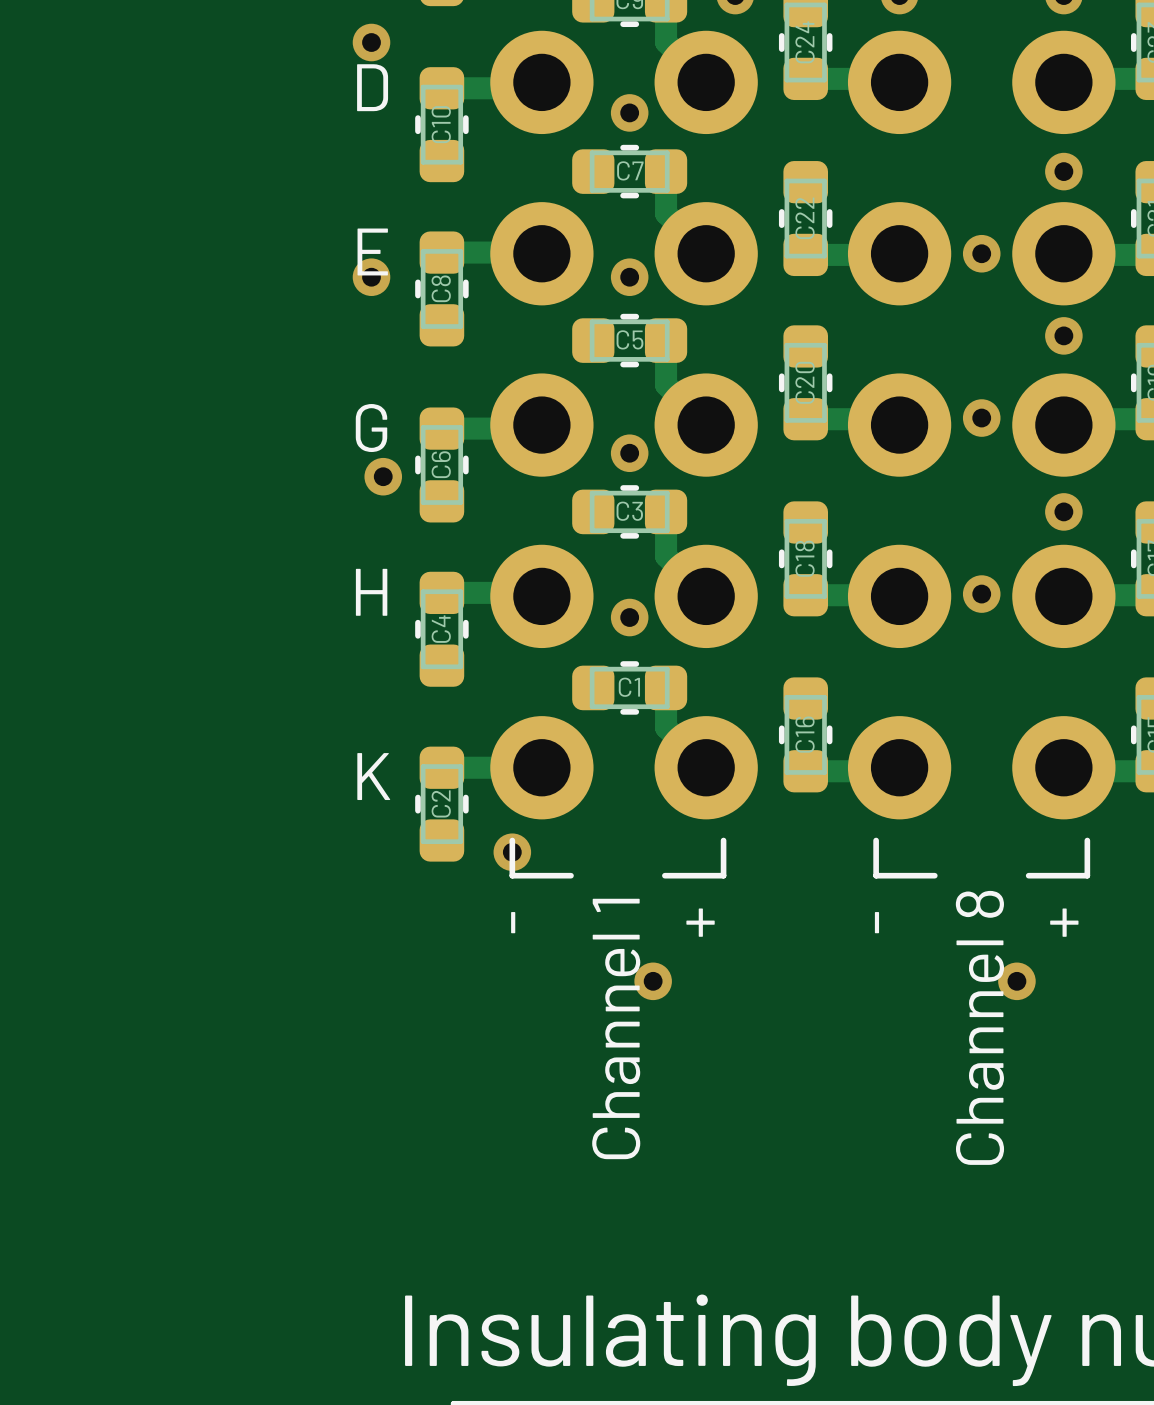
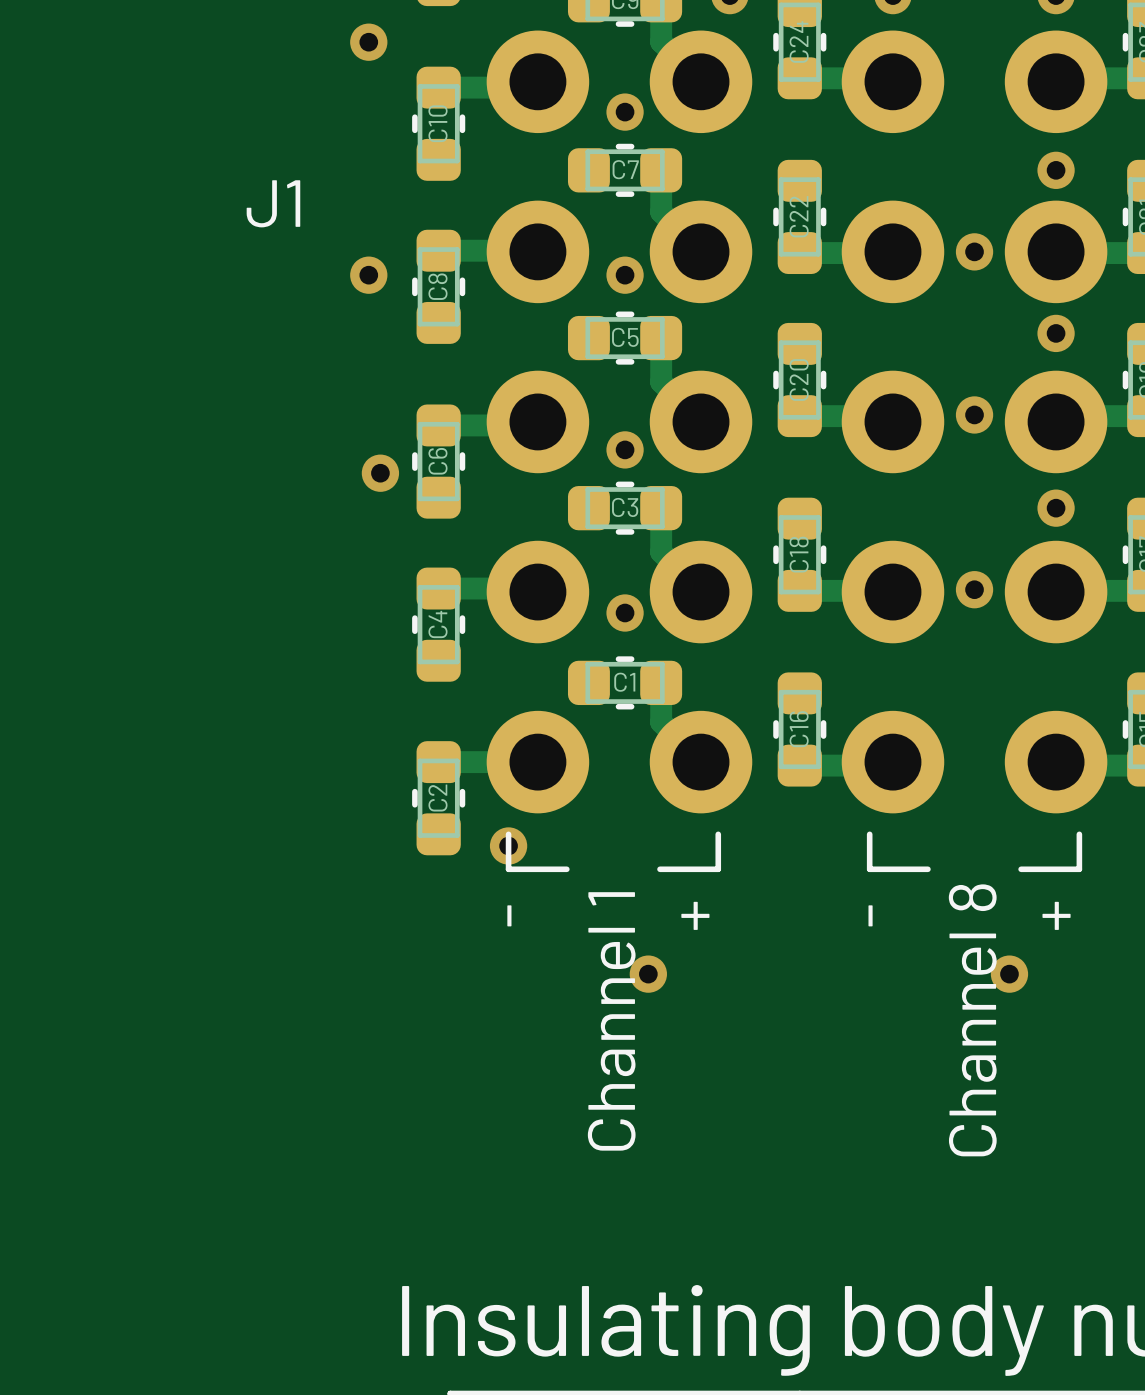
text: D (372, 87) -> none
J1 name: none -> J1 (273, 203)
text: E (372, 251) -> none
text: G (371, 428) -> none
text: H (371, 592) -> none
text: K (373, 776) -> none

